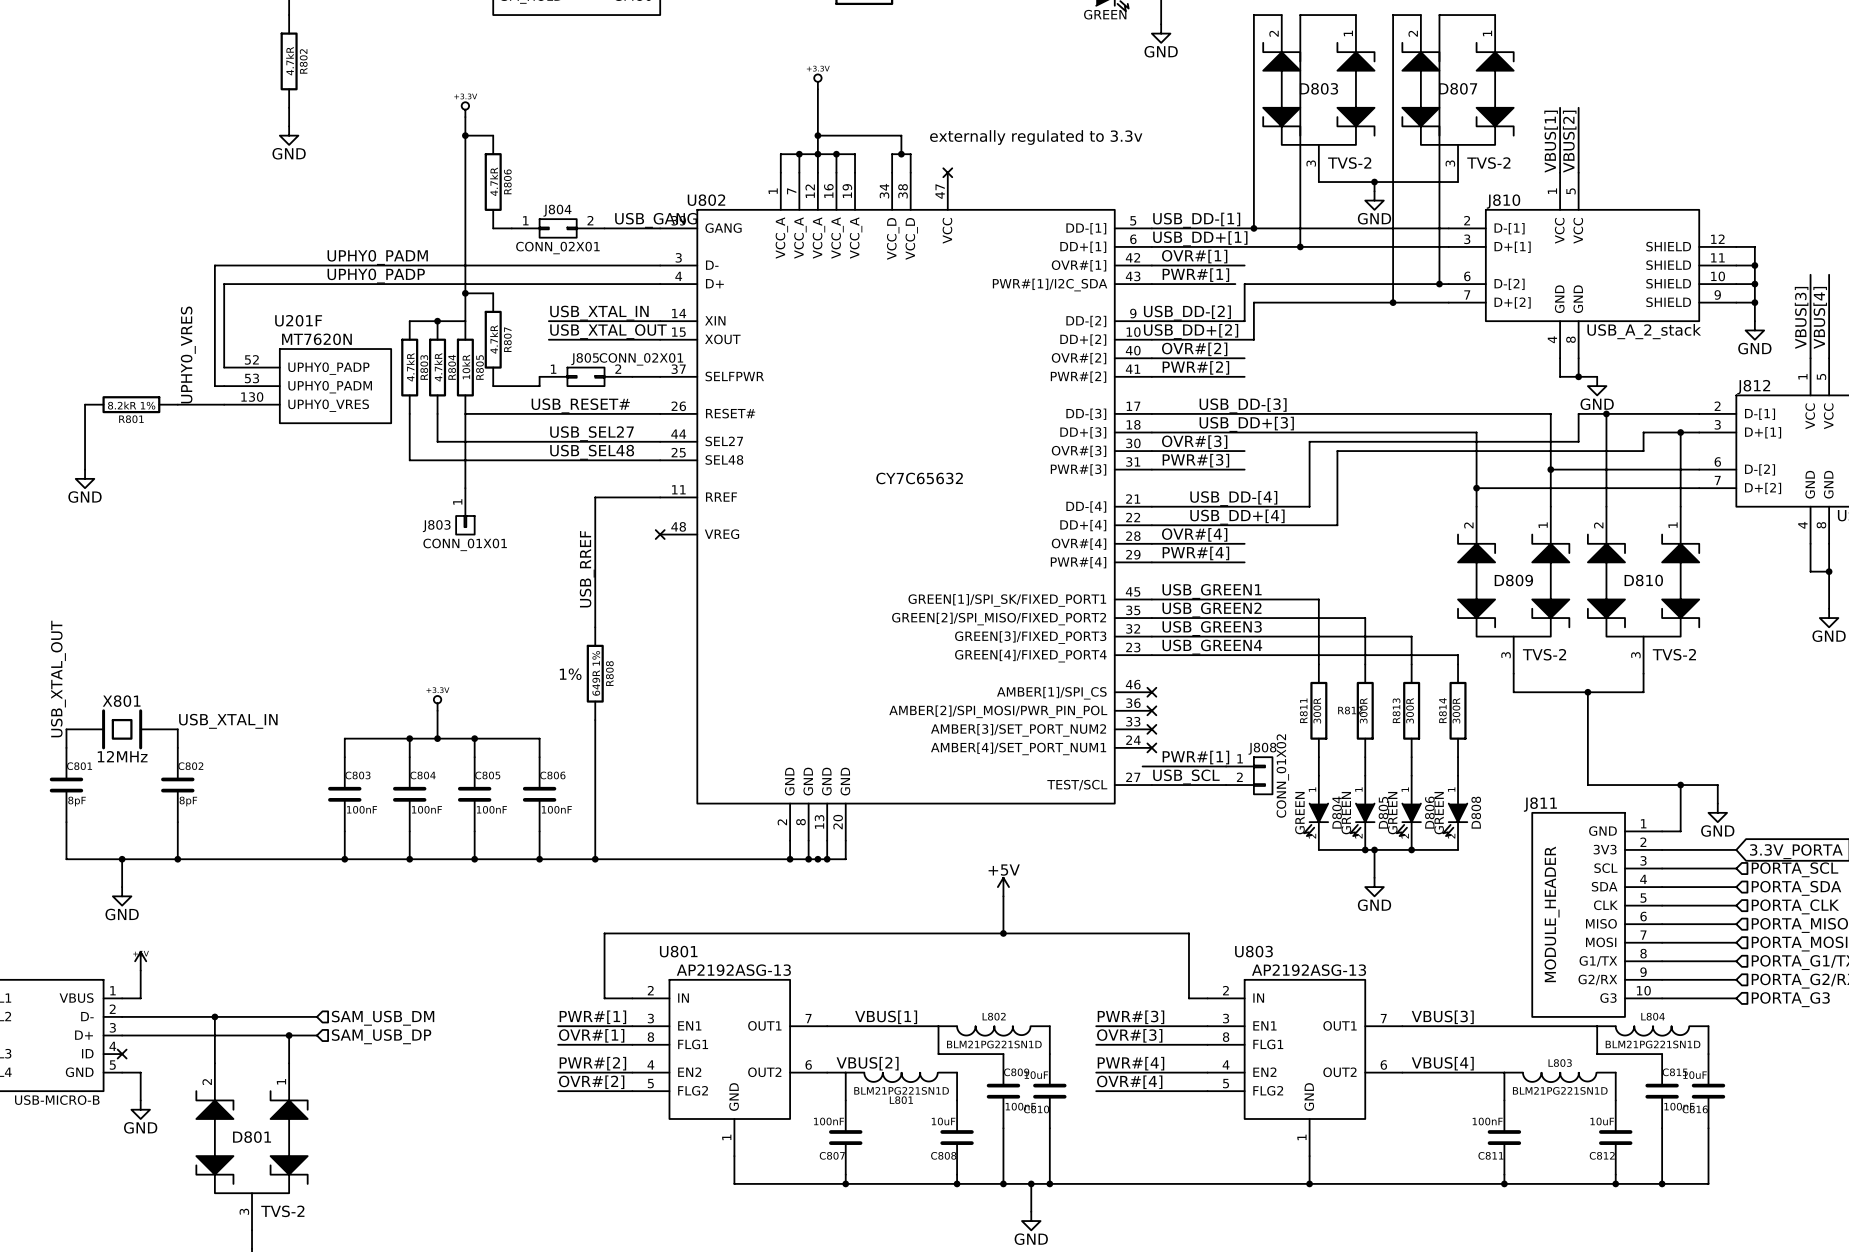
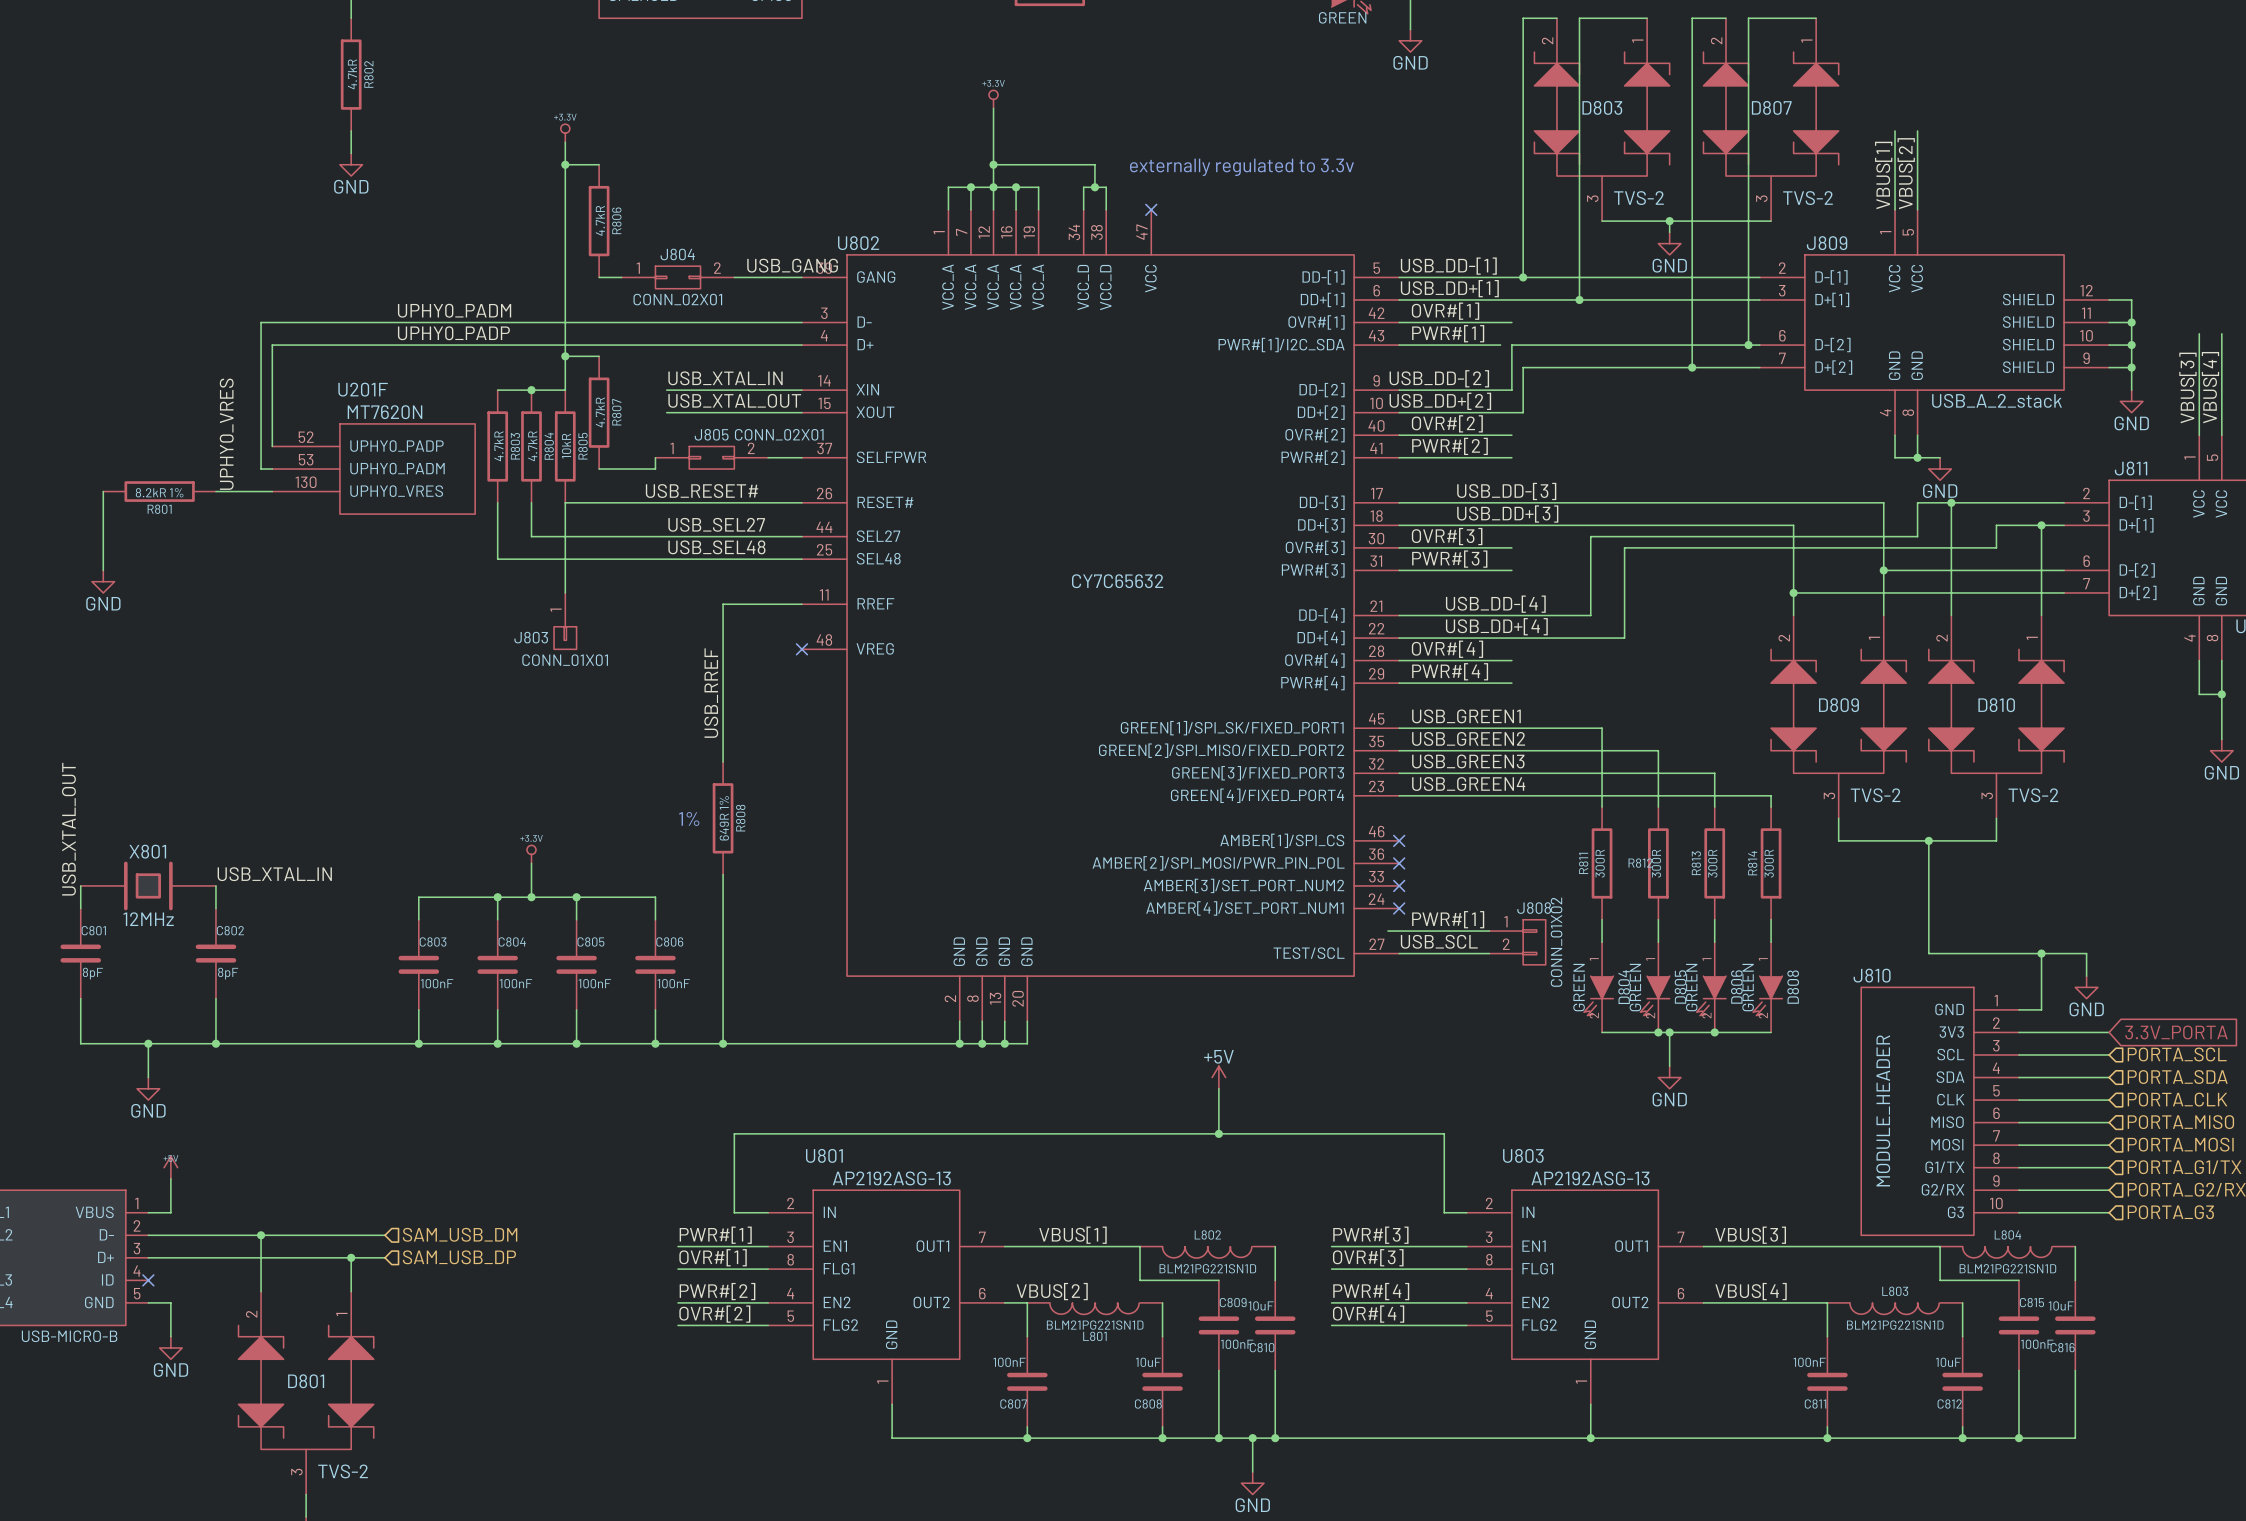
J810 name: J810 (1503, 201) -> J809 (1827, 243)
J812 name: J812 (1753, 387) -> J811 (2131, 468)
J811 name: J811 (1540, 804) -> J810 (1872, 975)
junction: (817, 859) -> none

